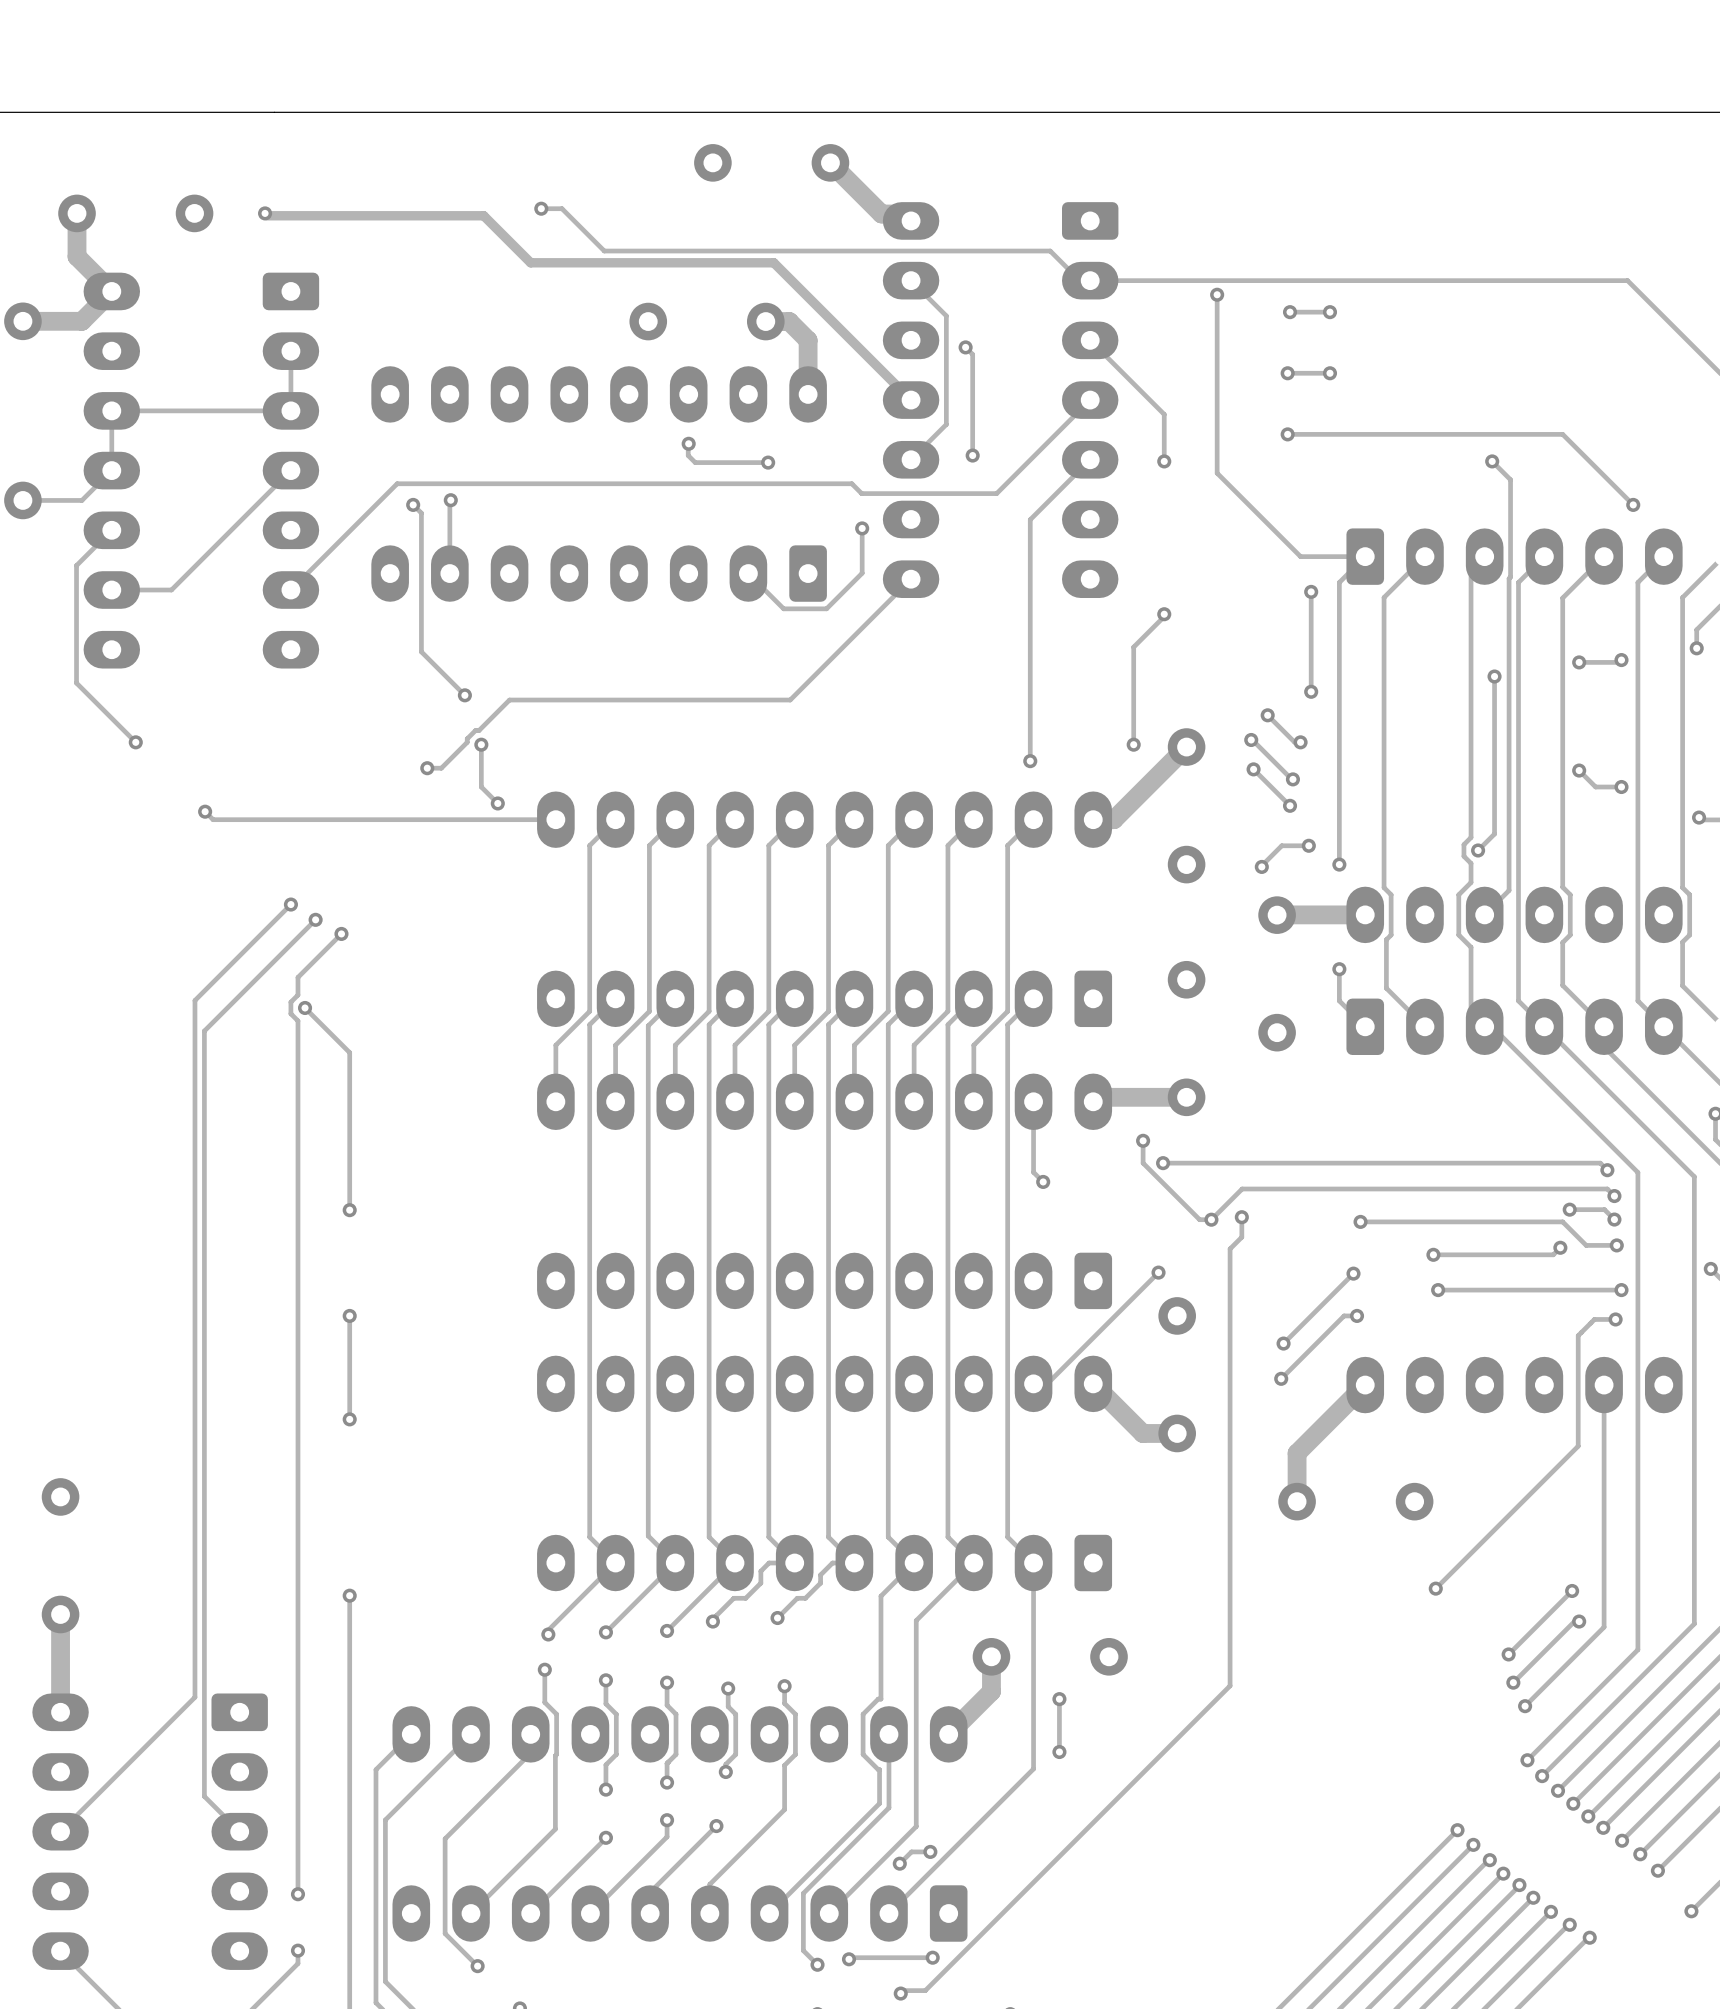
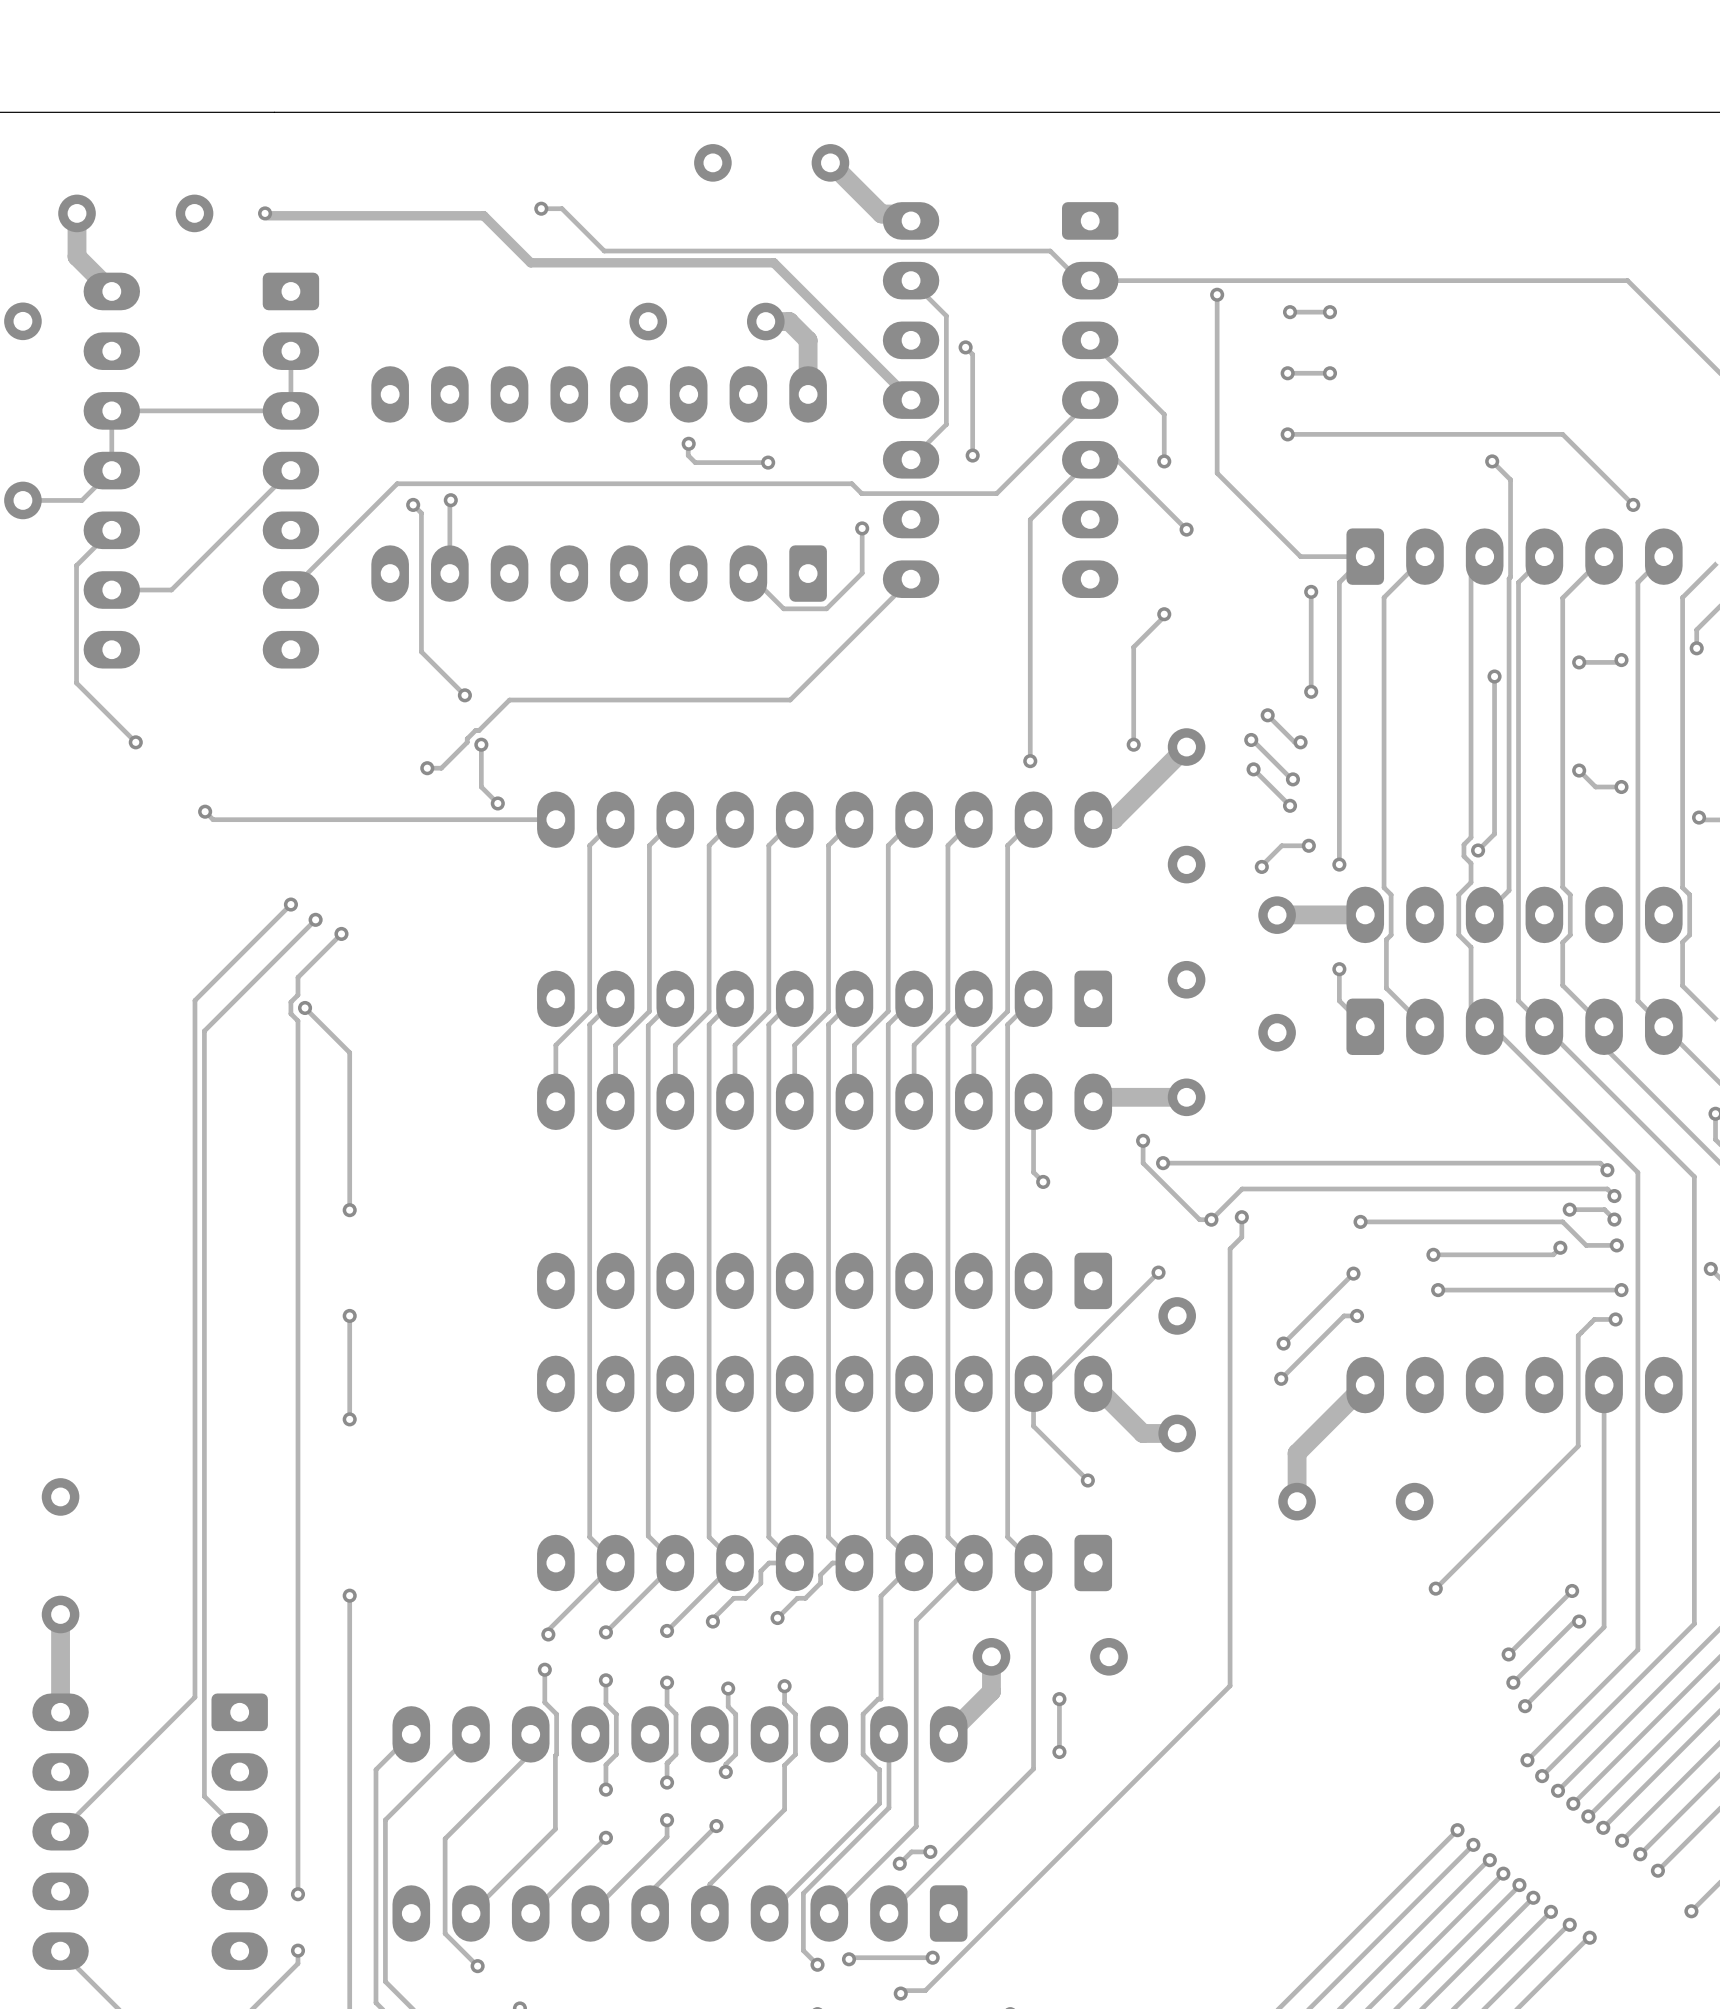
track: (111, 291) (81, 321) (22, 321) -> none
track: none -> (1090, 459) (1116, 459) (1186, 529)
via: none -> (1186, 529)
track: none -> (1033, 1383) (1033, 1426) (1087, 1480)
via: none -> (1087, 1480)

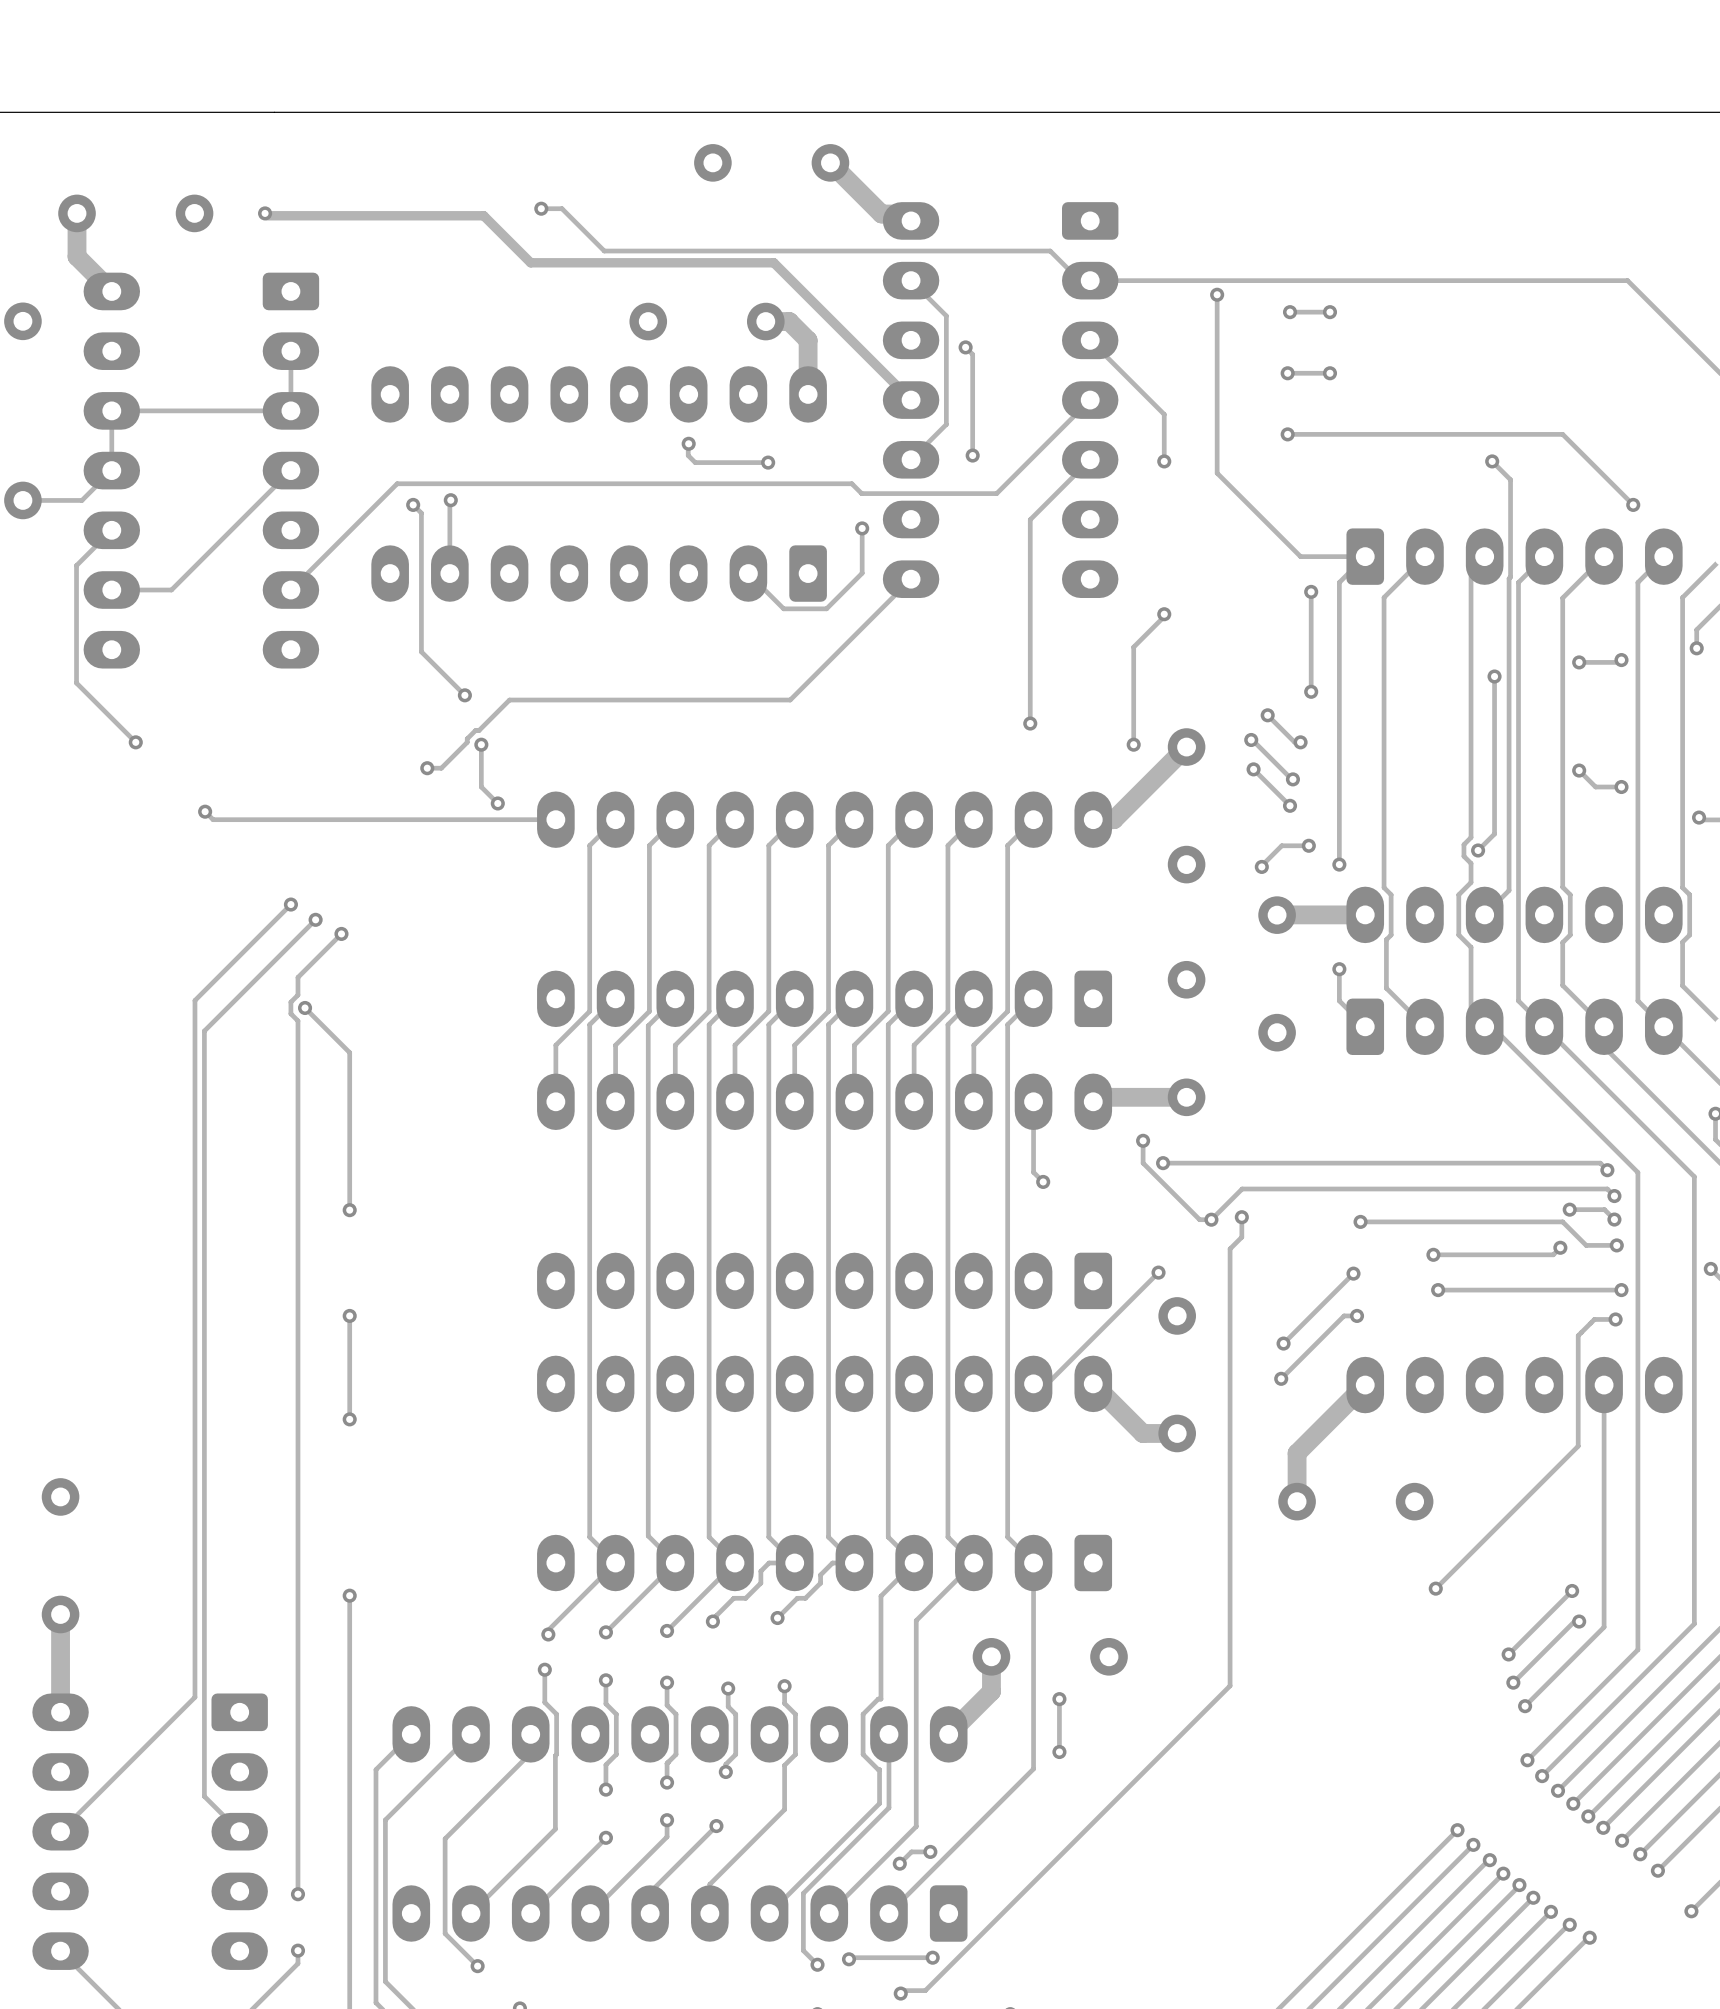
track: (1090, 459) (1116, 459) (1186, 529) -> none
via: (1186, 529) -> none
track: (1030, 723) (1030, 761) -> none
via position: (1030, 761) -> (1030, 723)
track: (1033, 1383) (1033, 1426) (1087, 1480) -> none
via: (1087, 1480) -> none

